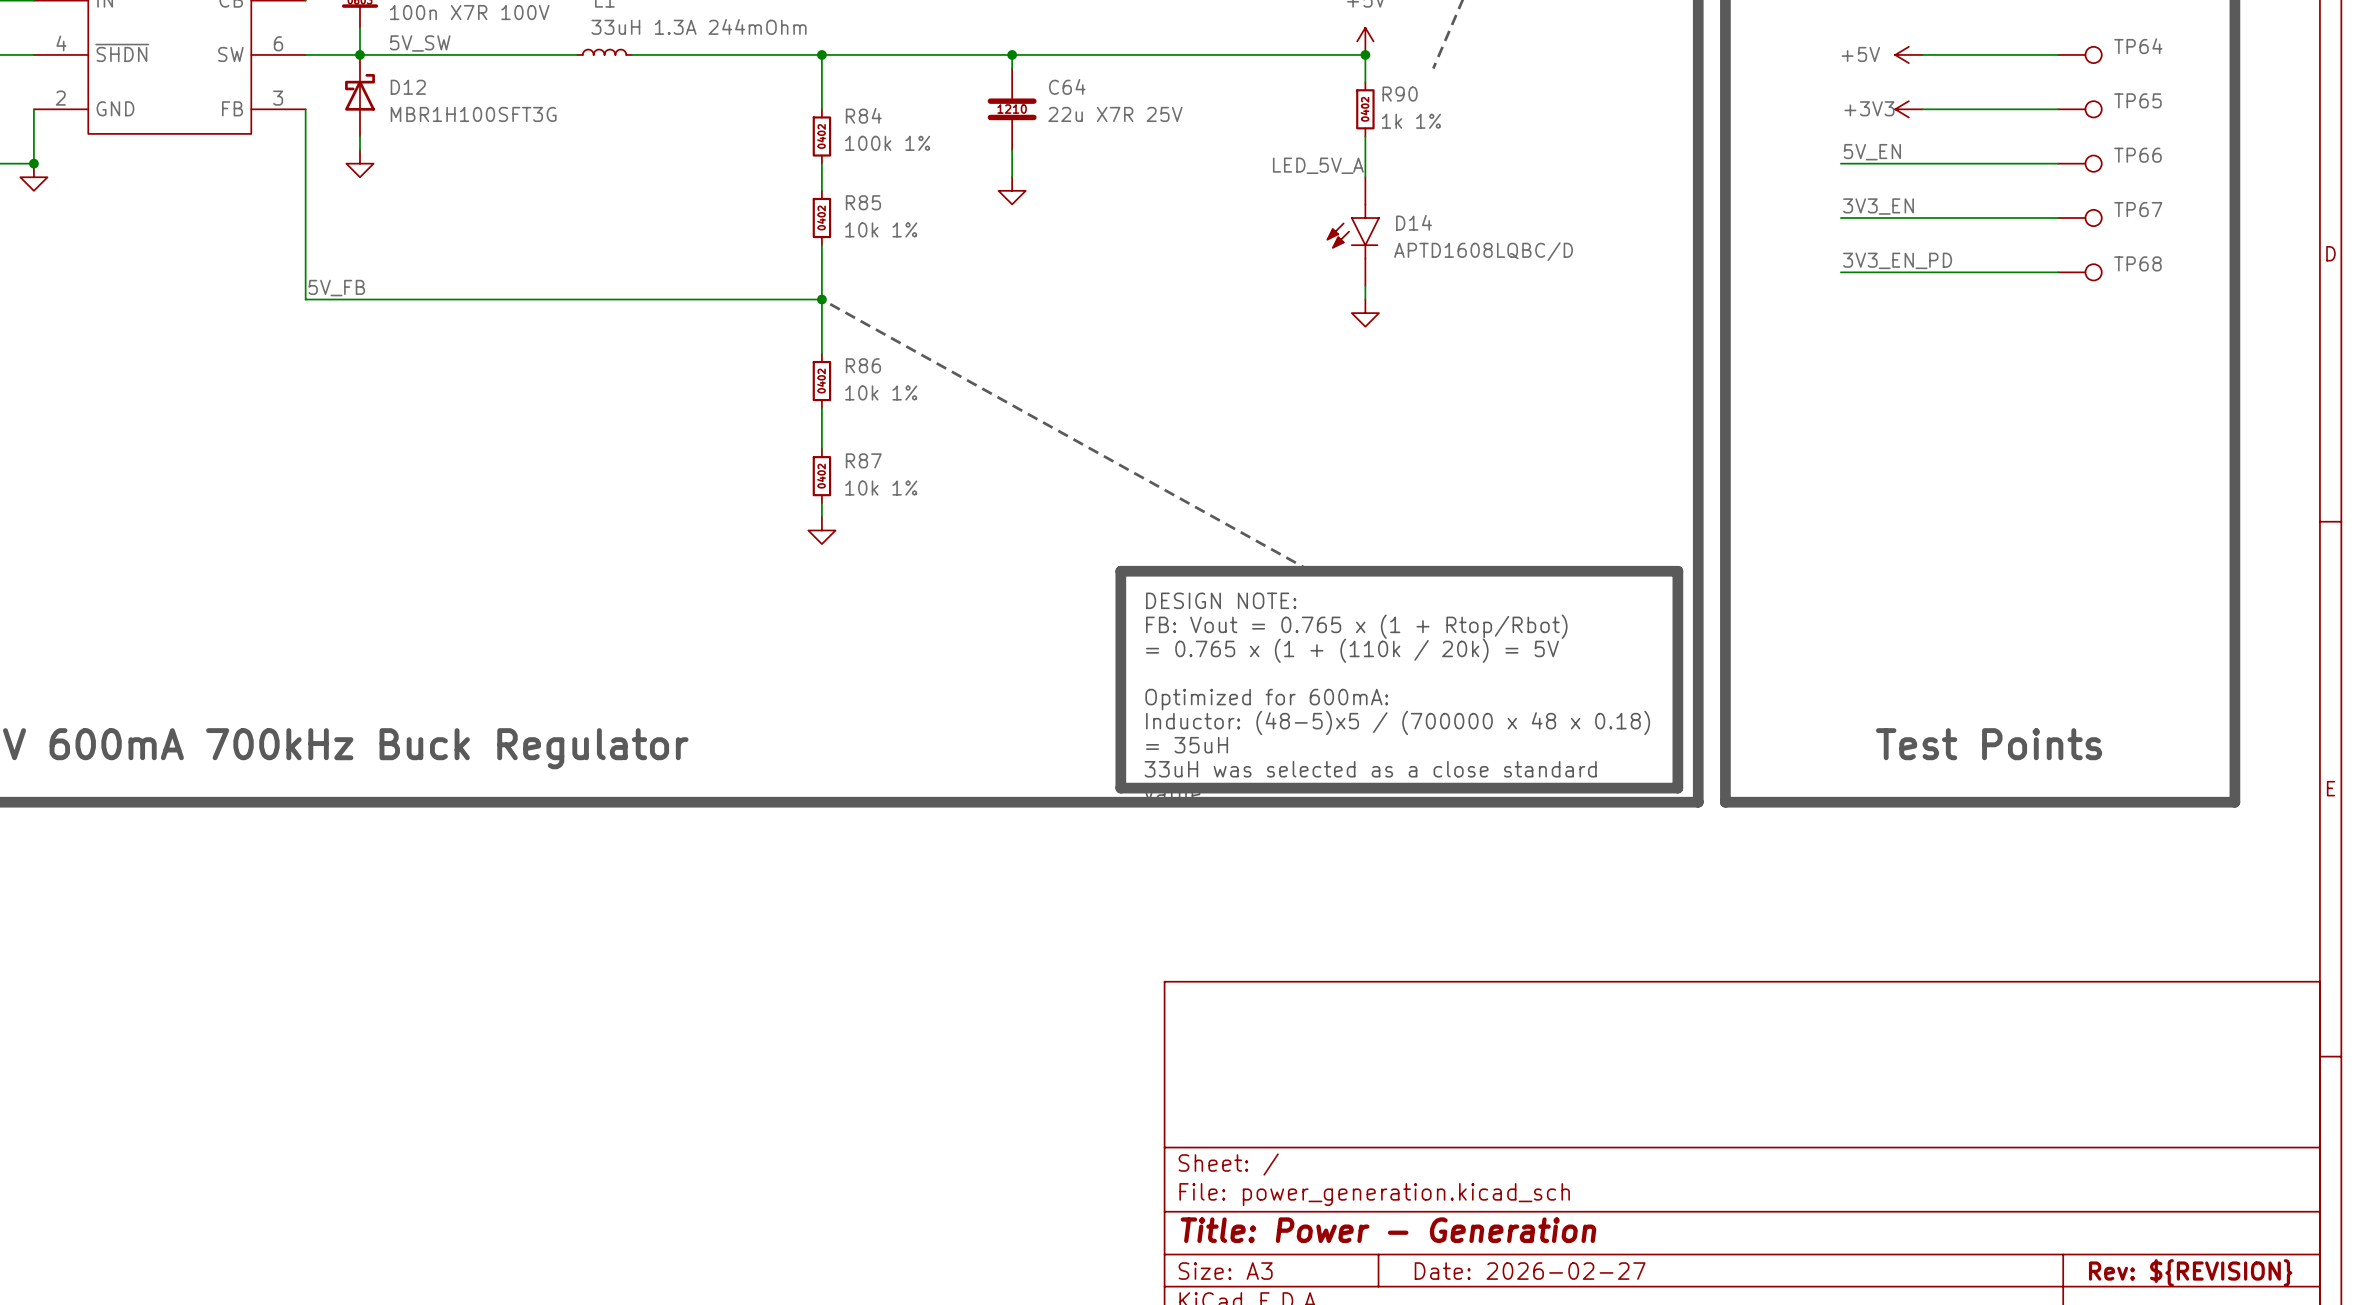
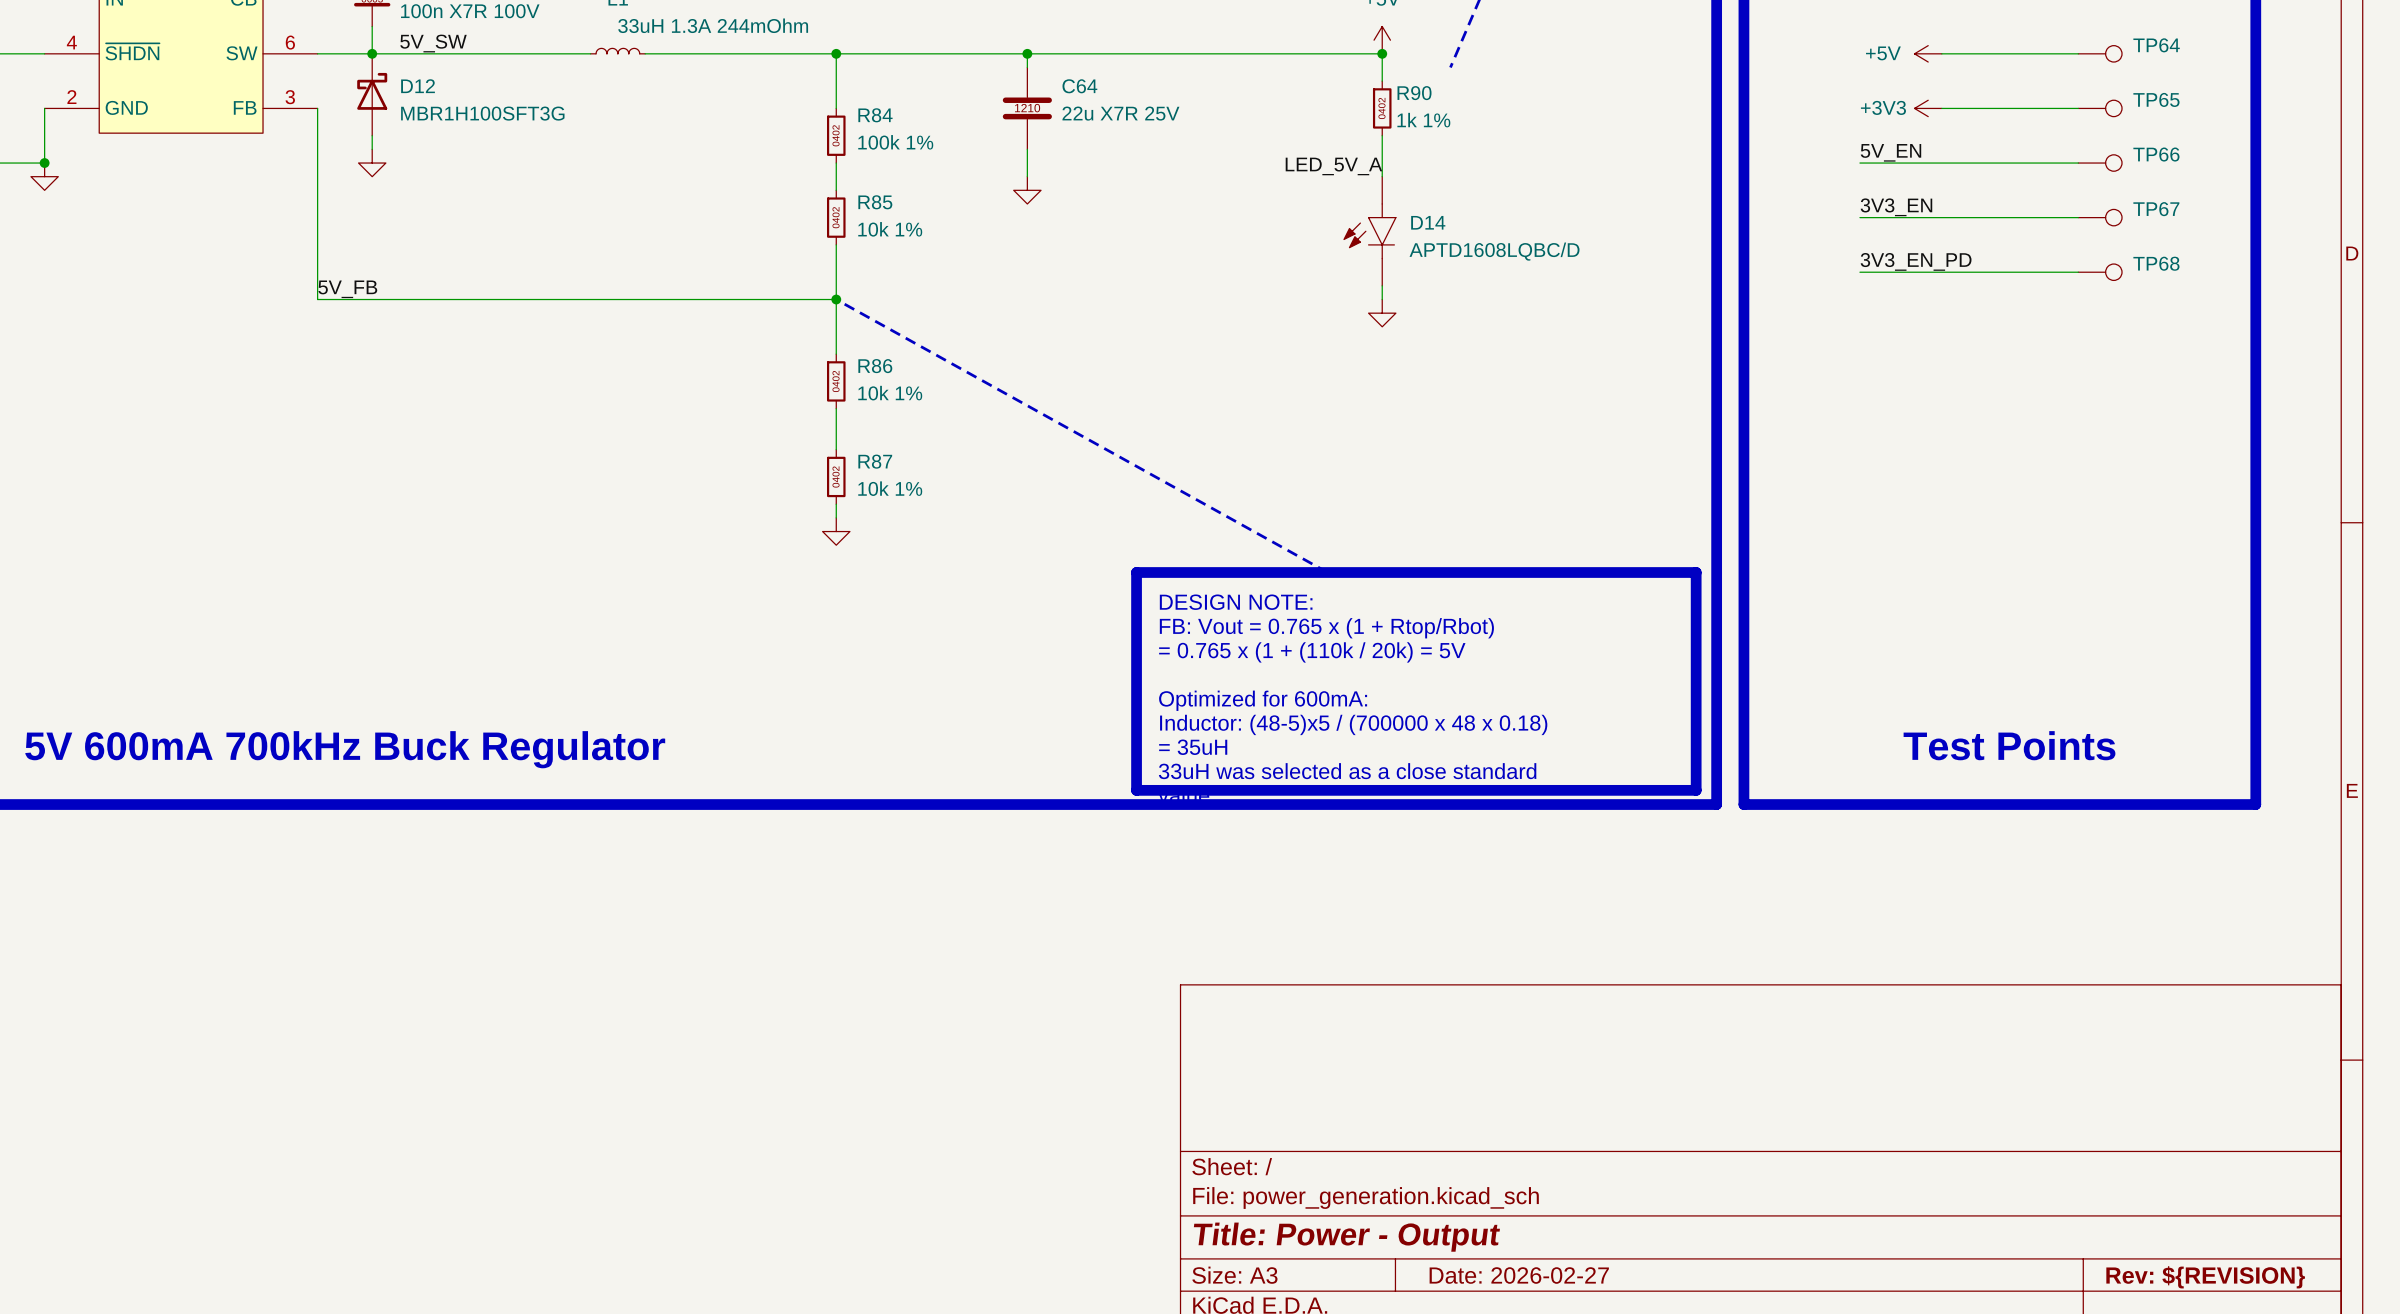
title block: Title: Power - Generation (1388, 1230) -> Title: Power - Output (1346, 1237)

